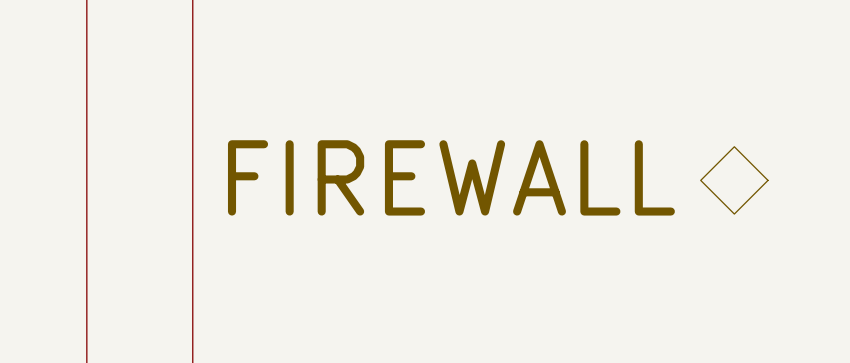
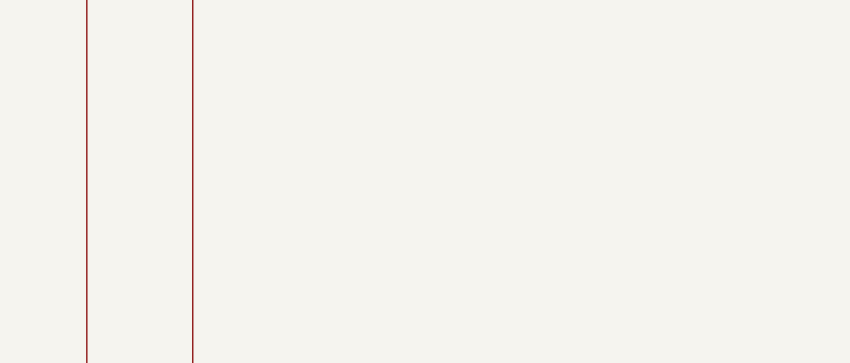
hierarchical label: FIREWALL (451, 177) -> none

